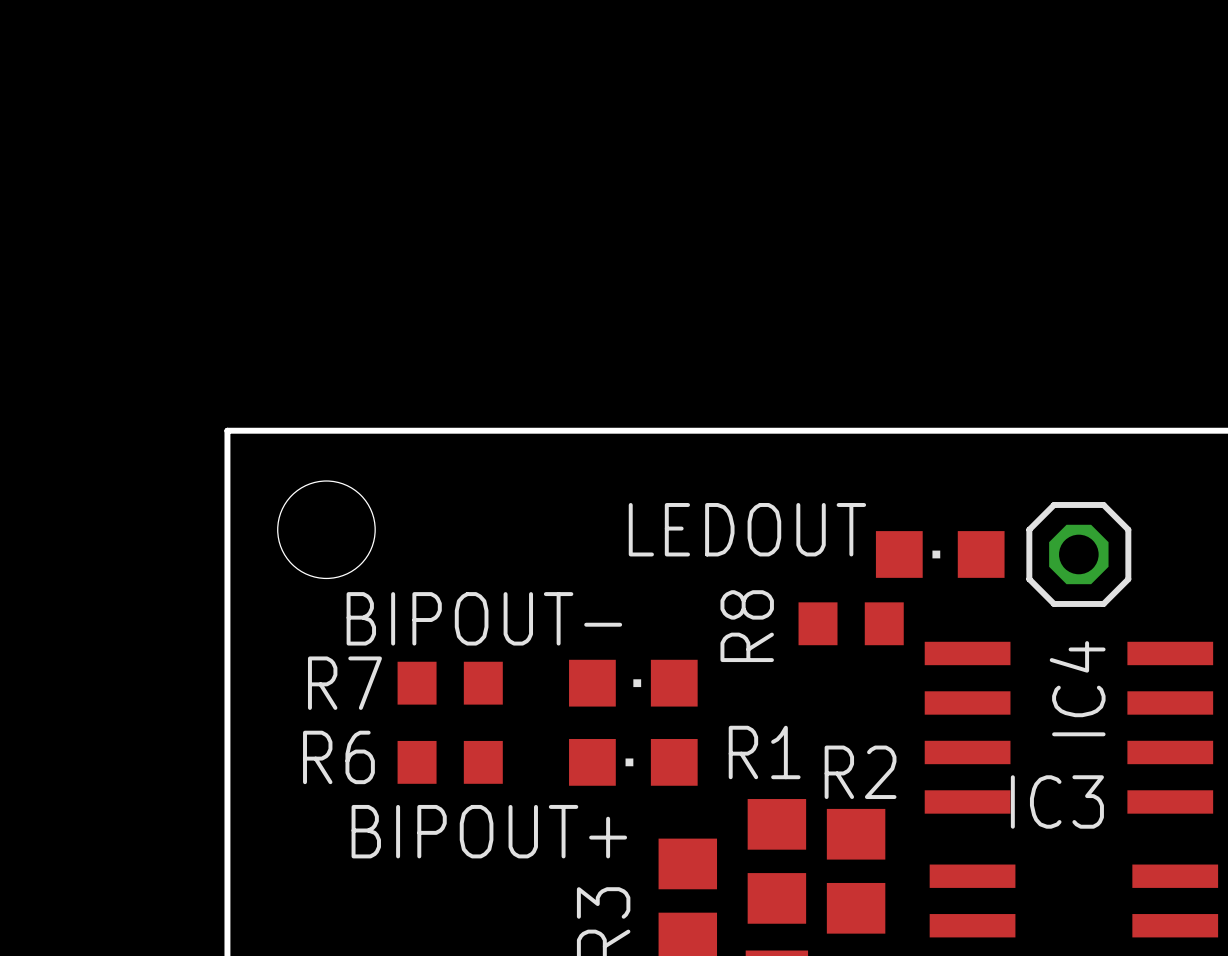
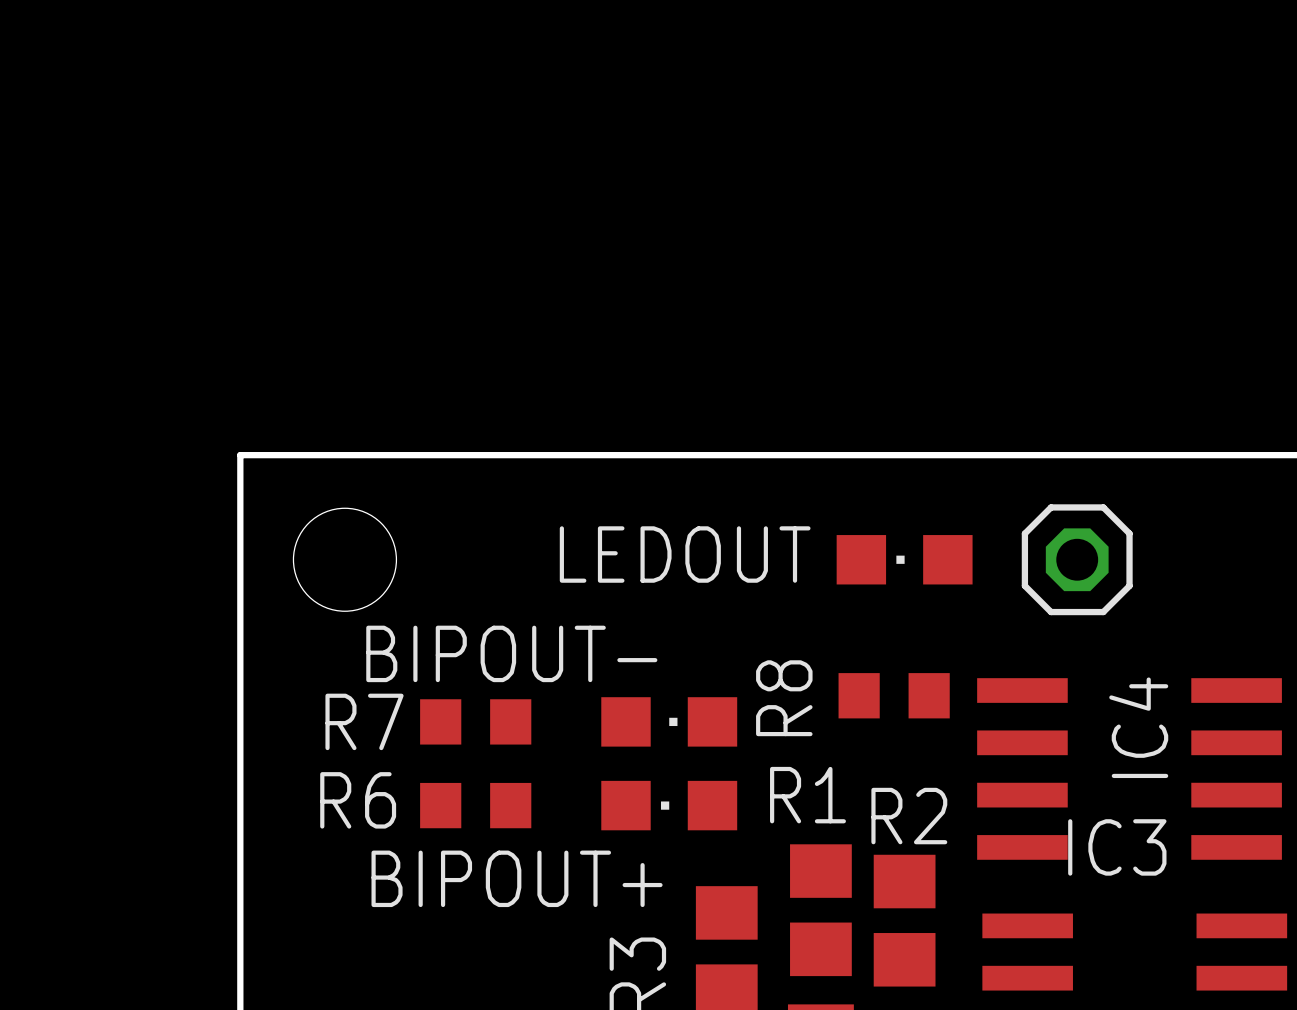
LEDOUT name position: LEDOUT (747, 529) -> LEDOUT (685, 554)
LEDOUT position: (940, 554) -> (904, 559)
part position: (1078, 554) -> (1077, 559)
R8 position: (851, 623) -> (894, 695)

